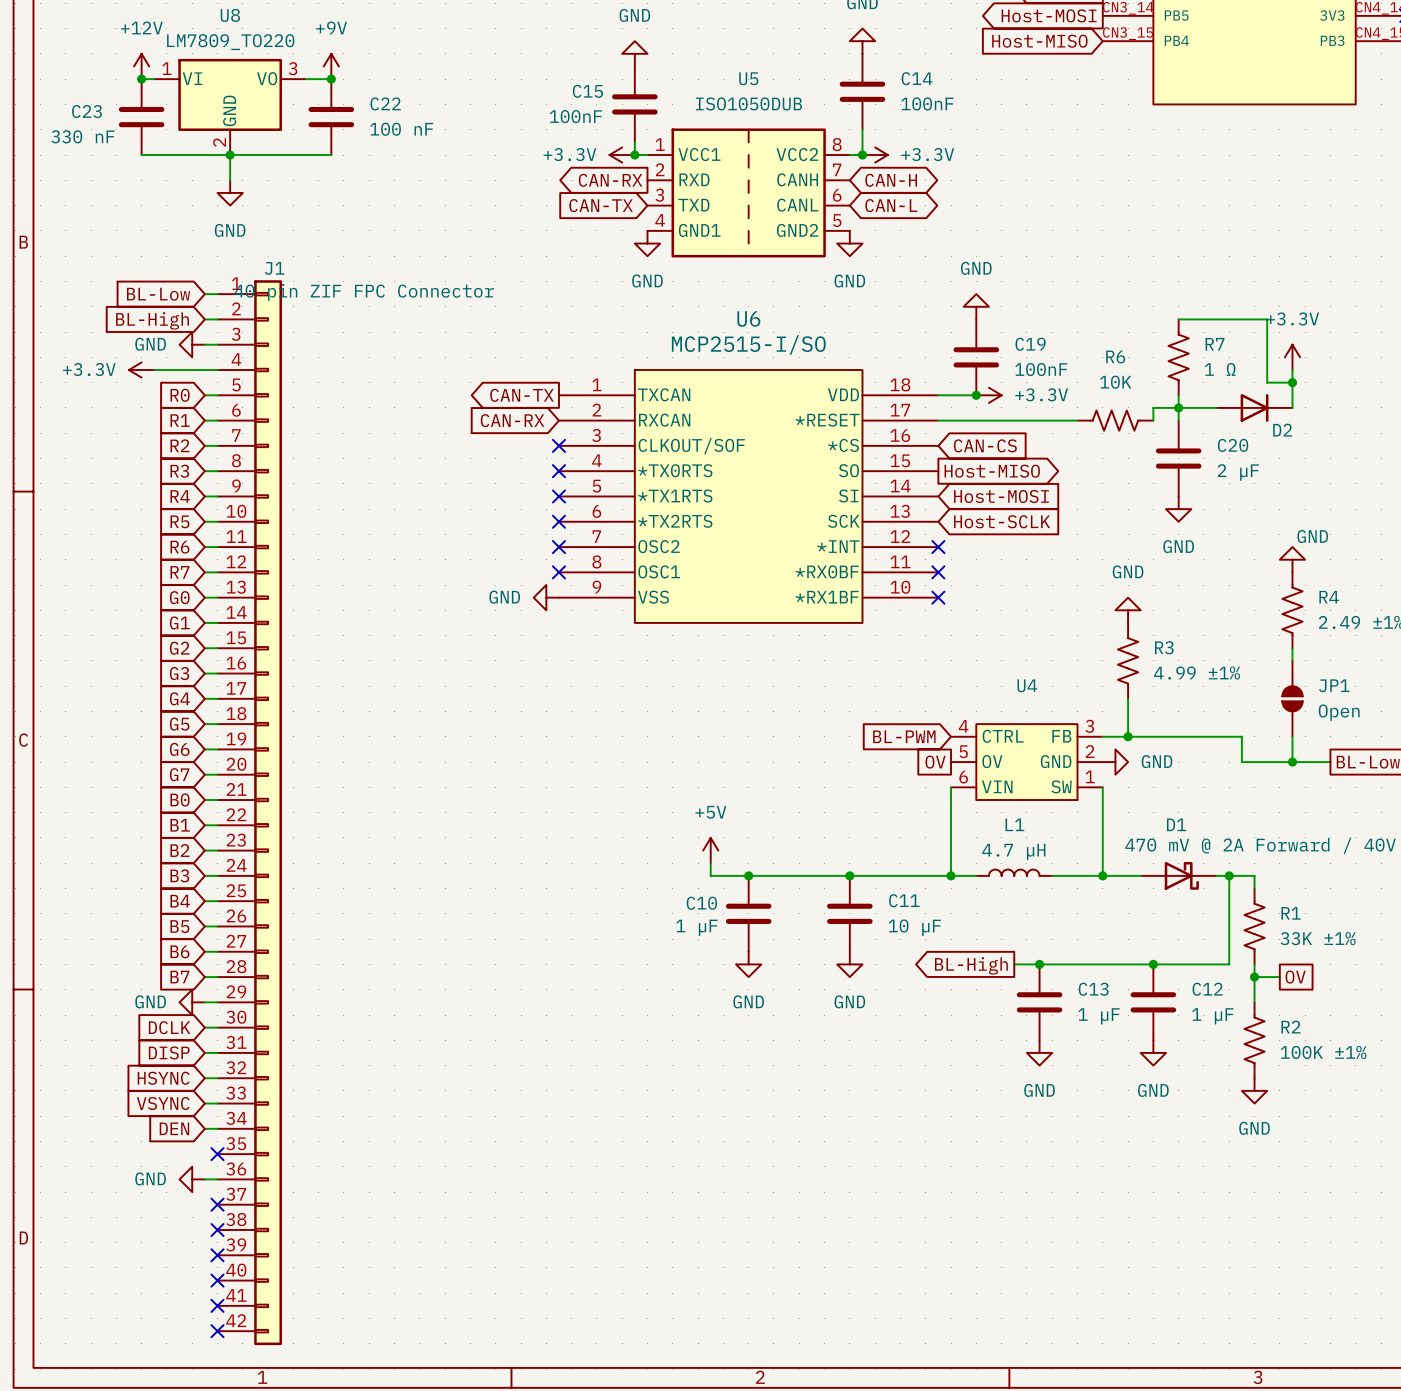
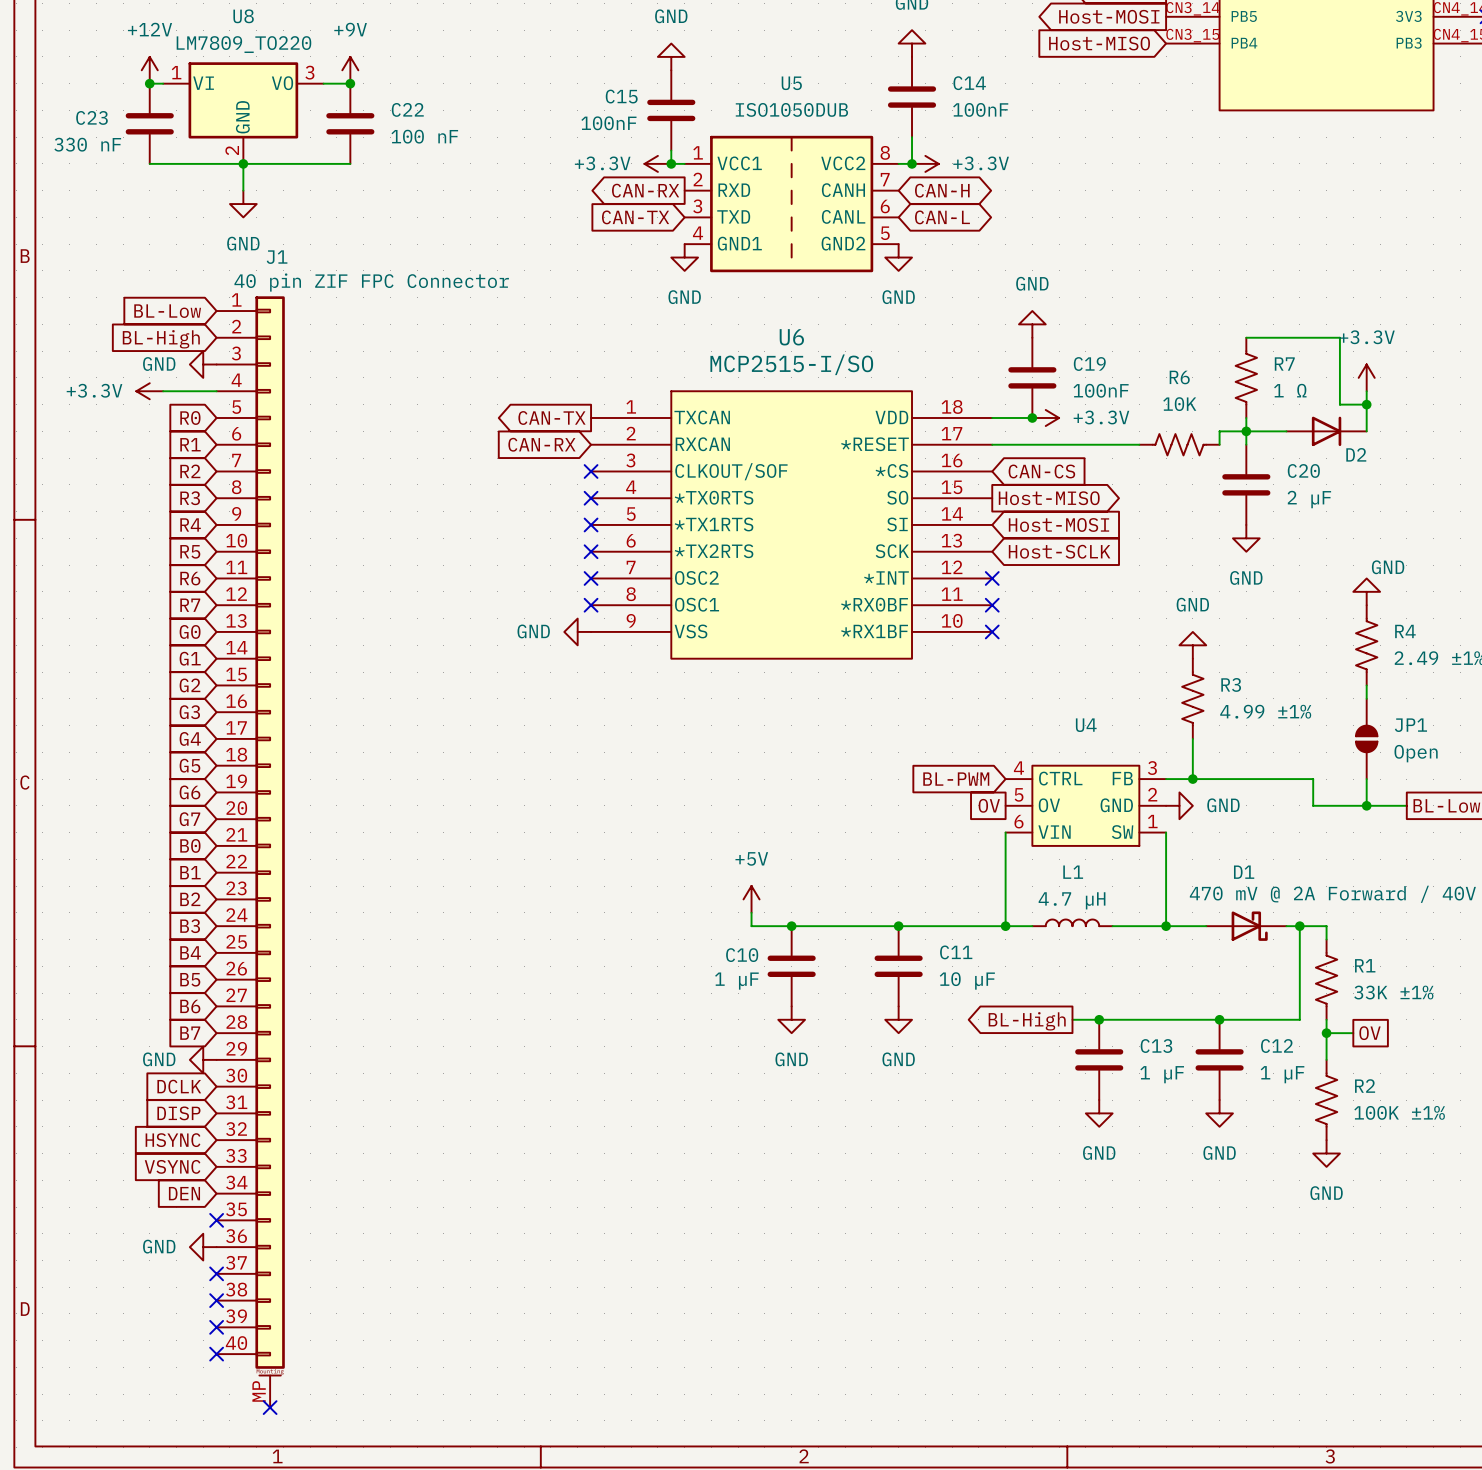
J1 symbol: [217, 280, 283, 1346] -> [216, 296, 285, 1408]
no-connect mark position: (217, 1154) -> (216, 1220)
no-connect mark position: (217, 1204) -> (216, 1273)
no-connect mark position: (217, 1230) -> (216, 1300)
no-connect mark position: (217, 1255) -> (216, 1327)
no-connect mark position: (217, 1280) -> (216, 1354)
no-connect mark: (217, 1305) -> none
no-connect mark: (217, 1331) -> none
no-connect mark: none -> (270, 1407)

